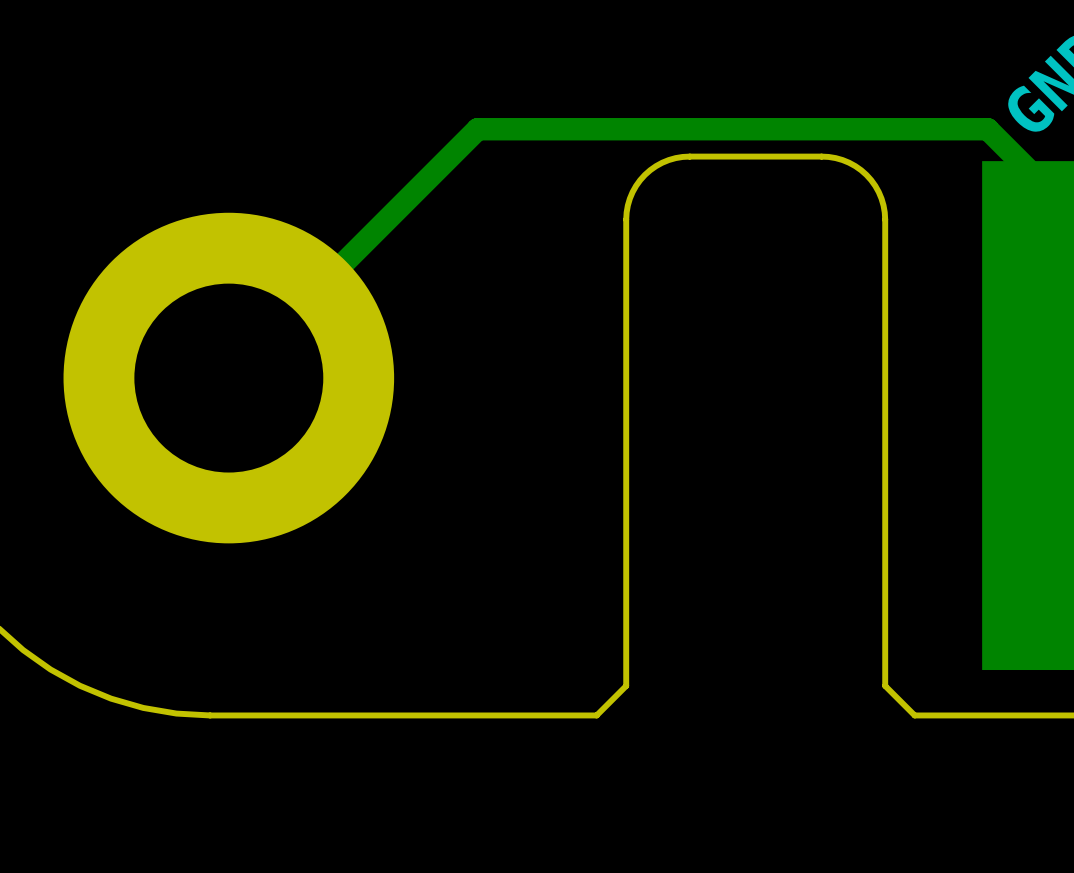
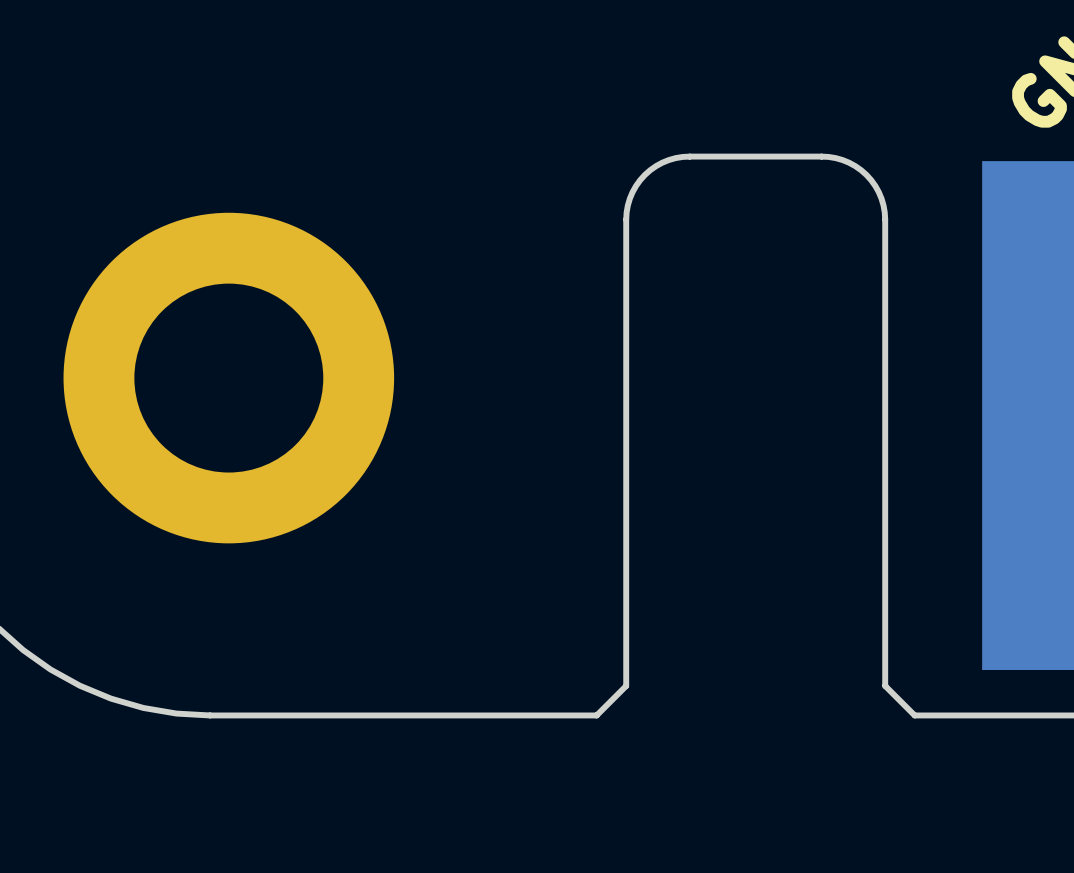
track: (1034, 176) (987, 129) (477, 129) (228, 378) -> none

